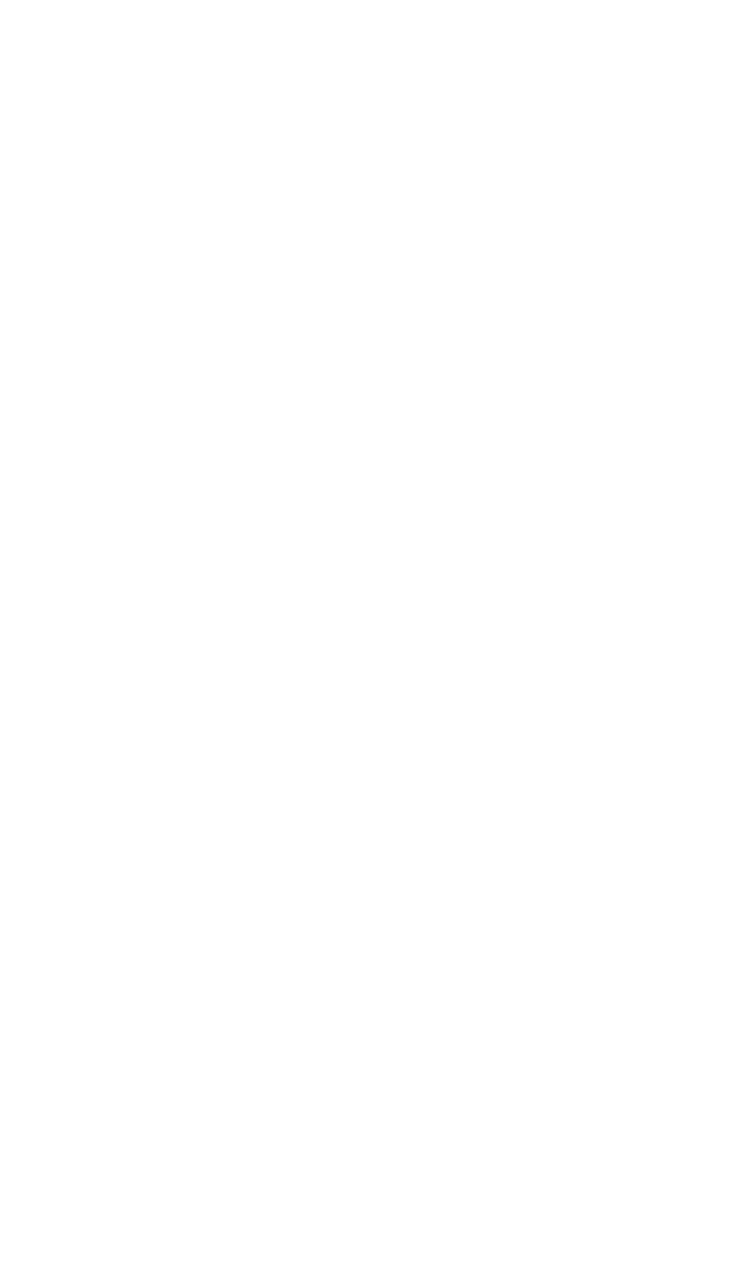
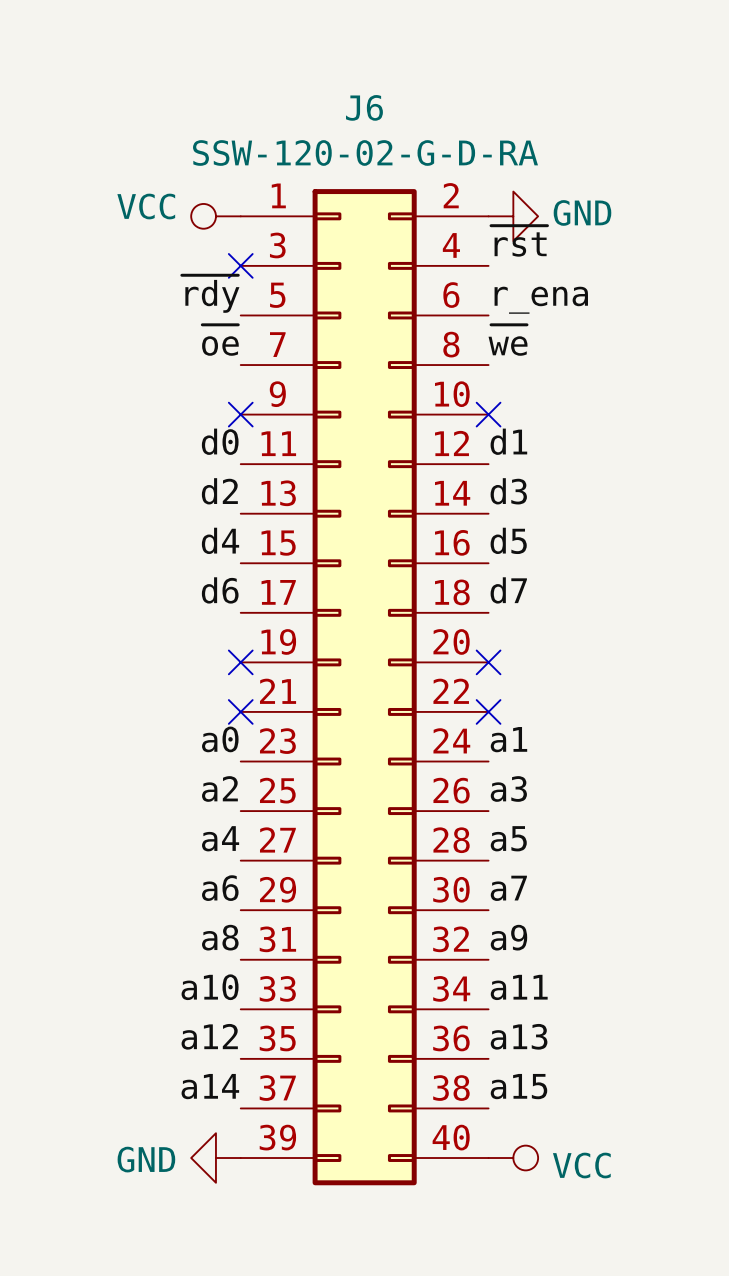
power symbol: none -> VCC (215, 216)
power symbol: none -> GND (513, 216)
label: none -> ~{rst} (519, 241)
no-connect mark: none -> (240, 265)
label: none -> ~{rdy} (210, 294)
label: none -> r_ena (541, 300)
label: none -> ~{oe} (220, 340)
label: none -> ~{we} (508, 340)
no-connect mark: none -> (240, 414)
no-connect mark: none -> (488, 414)
label: none -> d0 (220, 441)
label: none -> d1 (508, 441)
label: none -> d2 (219, 491)
label: none -> d3 (508, 491)
label: none -> d4 (220, 540)
label: none -> d5 (508, 540)
label: none -> d6 (220, 590)
label: none -> d7 (508, 590)
no-connect mark: none -> (240, 662)
no-connect mark: none -> (488, 662)
J6: none -> SSW-120-02-G-D-RA (364, 687)
no-connect mark: none -> (240, 711)
no-connect mark: none -> (488, 711)
label: none -> a0 (220, 739)
label: none -> a1 (508, 739)
label: none -> a2 (219, 788)
label: none -> a3 (508, 788)
label: none -> a4 (220, 838)
label: none -> a5 (508, 838)
label: none -> a6 (220, 888)
label: none -> a7 (508, 888)
label: none -> a8 (220, 937)
label: none -> a9 (508, 937)
label: none -> a10 (210, 987)
label: none -> a11 (519, 987)
label: none -> a12 (209, 1036)
label: none -> a13 (519, 1036)
label: none -> a14 (210, 1086)
label: none -> a15 (519, 1086)
power symbol: none -> GND (215, 1158)
power symbol: none -> VCC (513, 1158)

